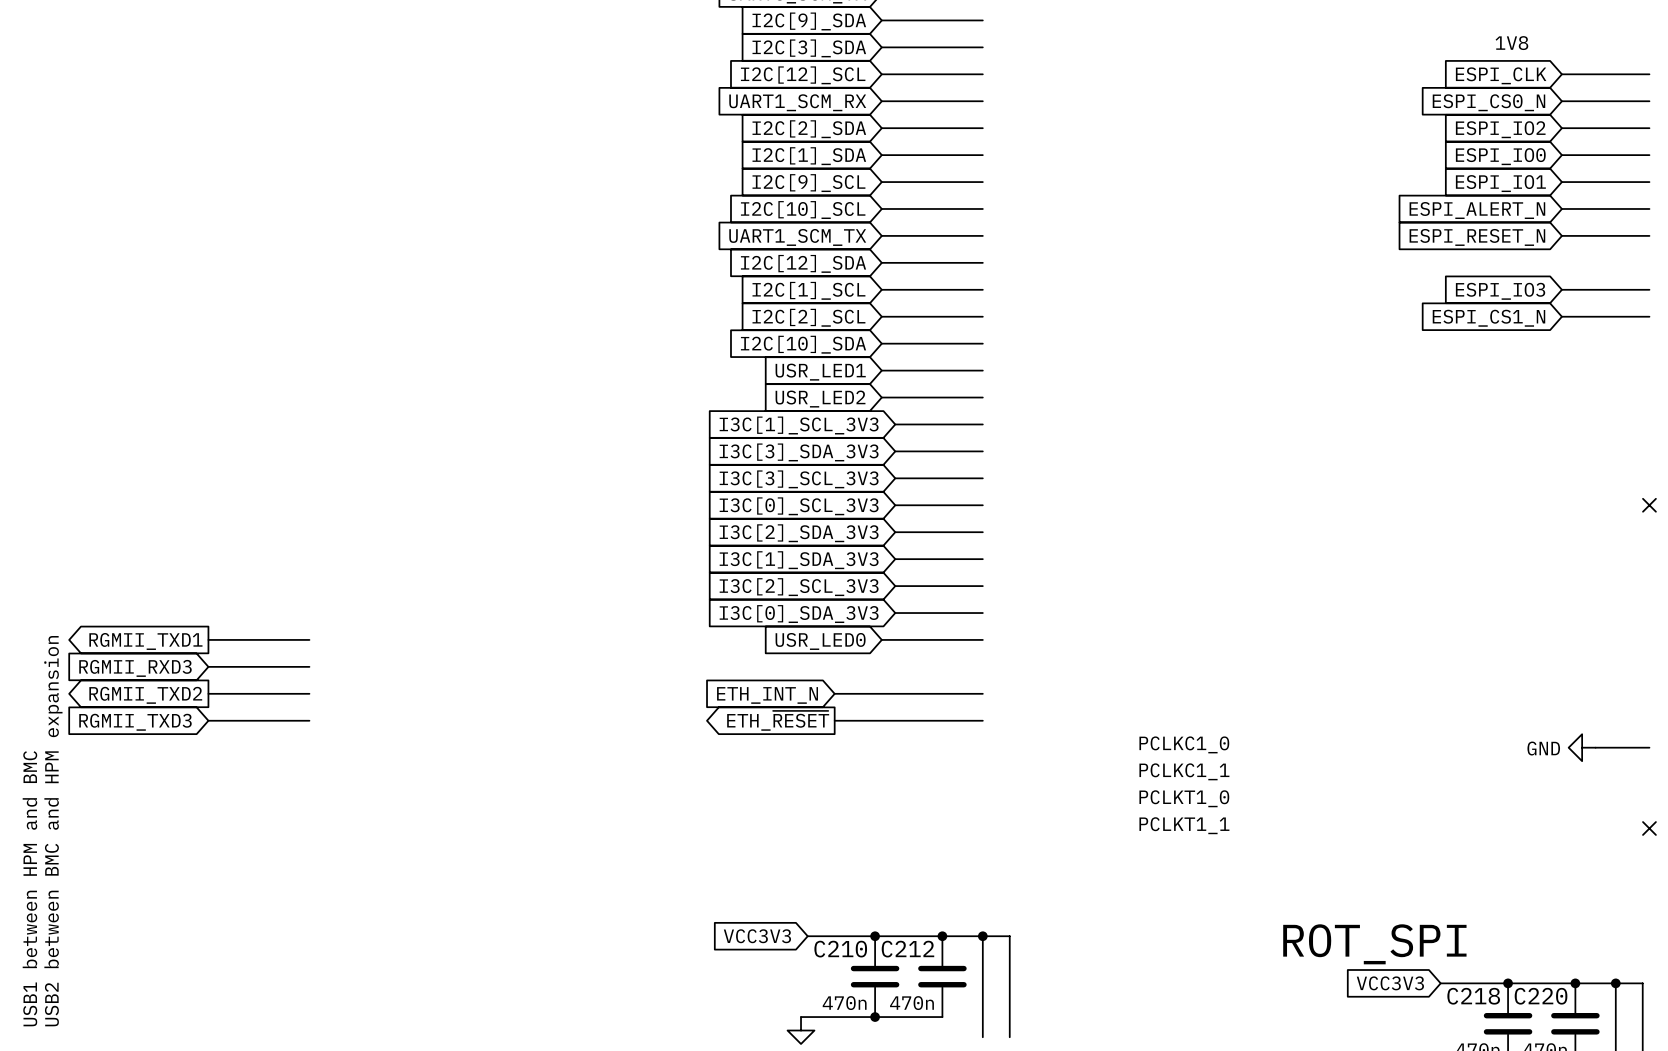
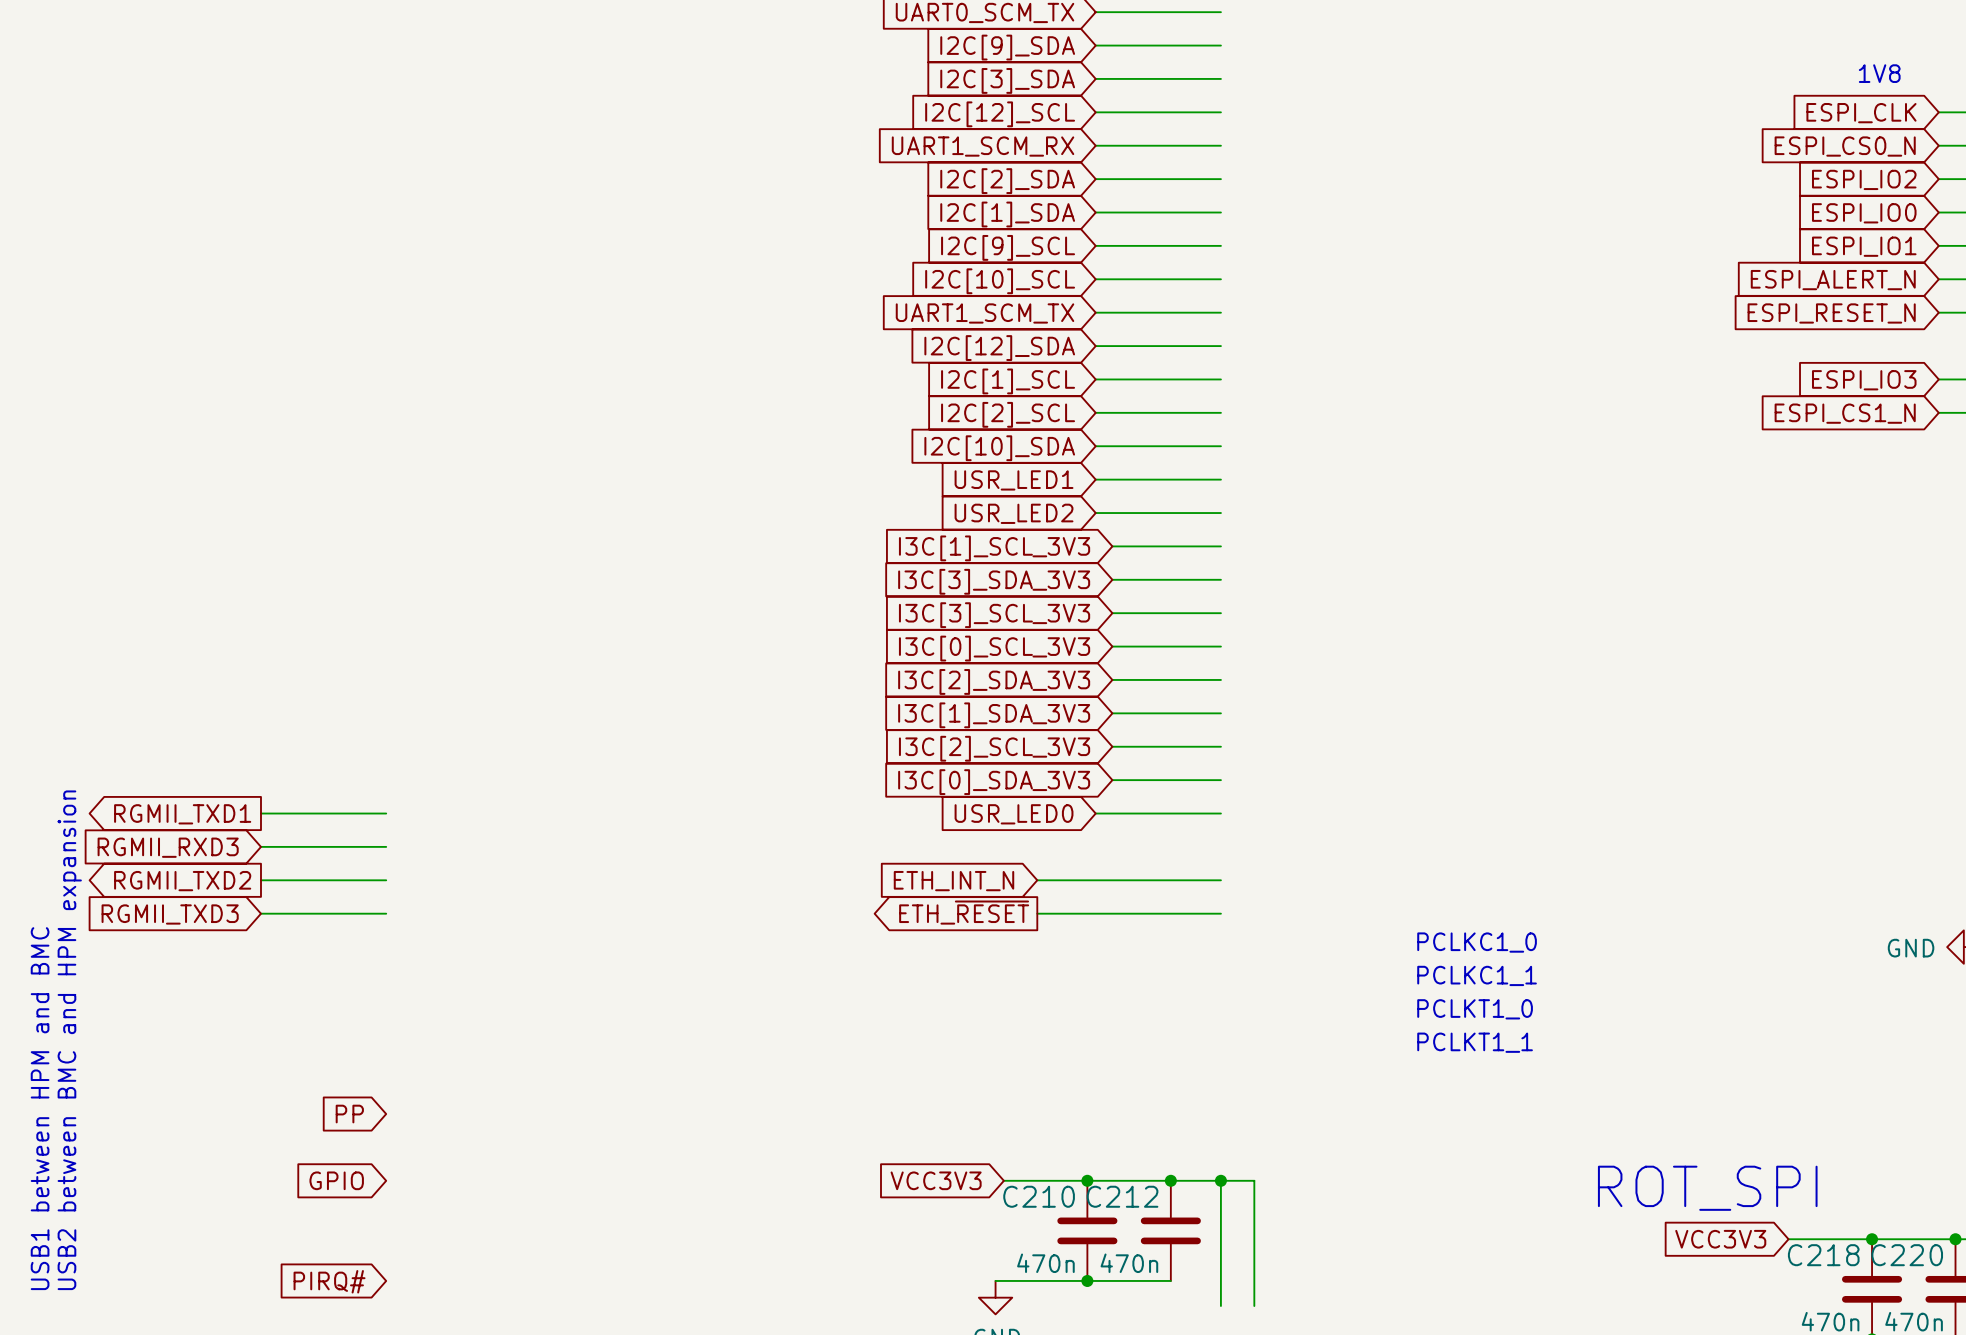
global label: none -> PP (349, 1114)
global label: none -> GPIO (336, 1180)
global label: none -> PIRQ# (329, 1281)

